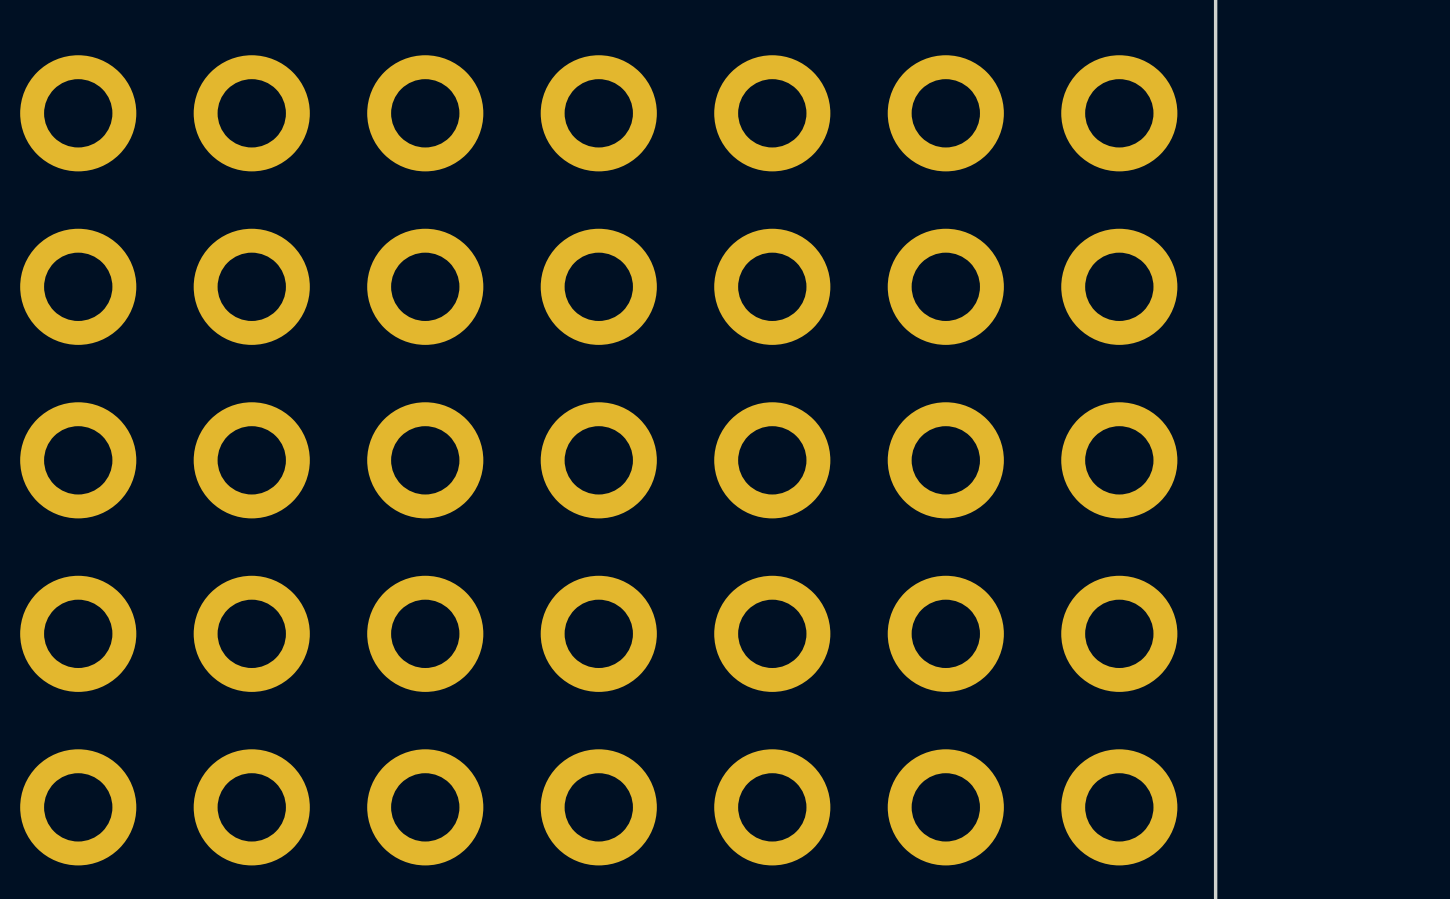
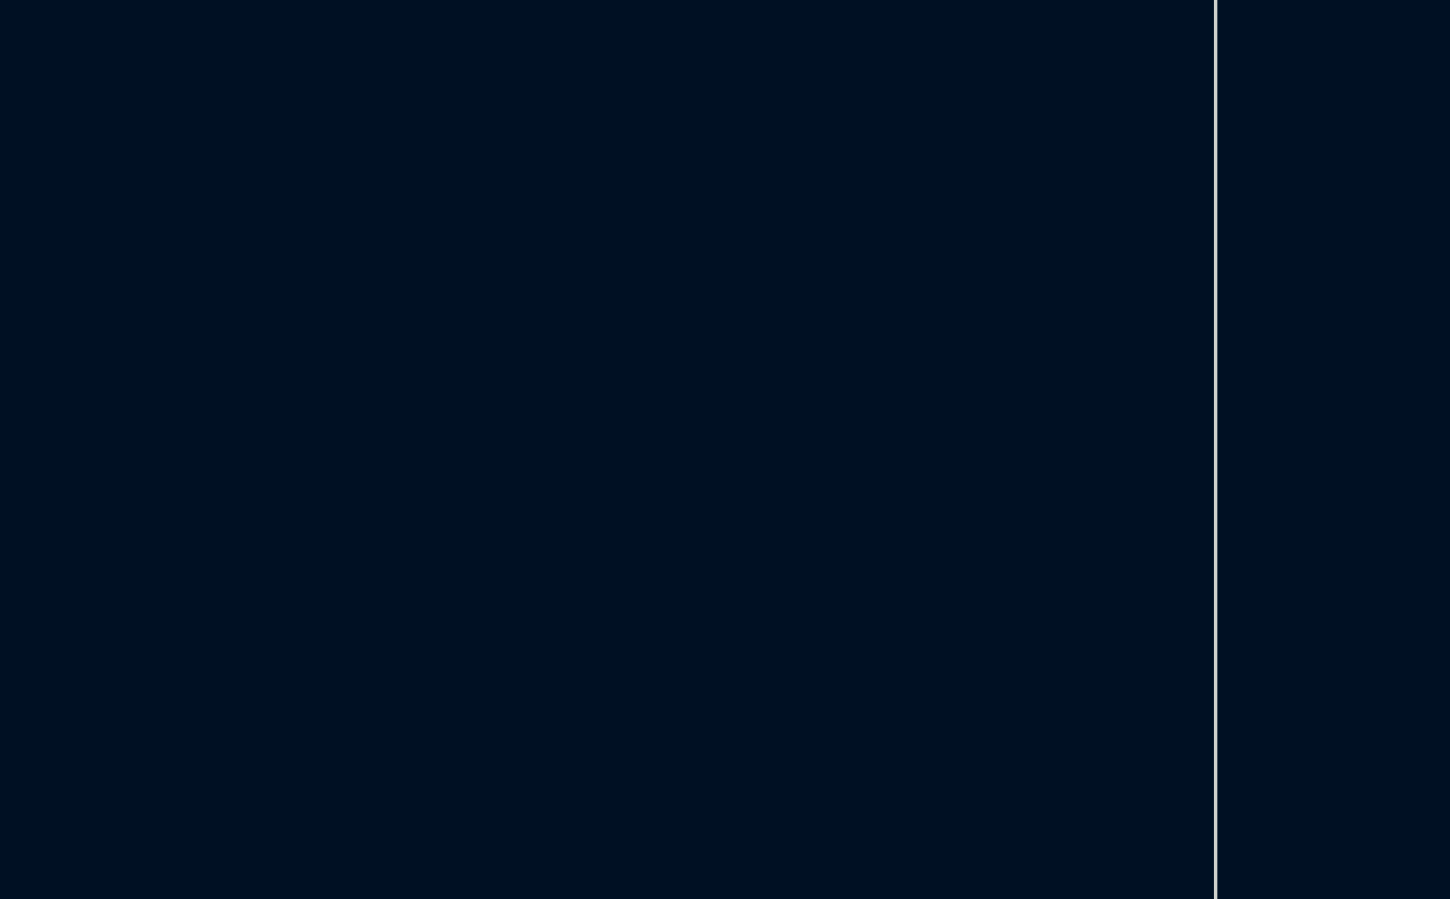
part: (78, 113) -> none
part: (251, 113) -> none
part: (425, 113) -> none
part: (598, 113) -> none
part: (772, 113) -> none
part: (945, 113) -> none
part: (1119, 113) -> none
part: (78, 286) -> none
part: (251, 286) -> none
part: (425, 286) -> none
part: (598, 286) -> none
part: (772, 286) -> none
part: (945, 286) -> none
part: (1119, 286) -> none
part: (78, 460) -> none
part: (251, 460) -> none
part: (425, 460) -> none
part: (598, 460) -> none
part: (772, 460) -> none
part: (945, 460) -> none
part: (1119, 460) -> none
part: (78, 633) -> none
part: (251, 633) -> none
part: (425, 633) -> none
part: (598, 633) -> none
part: (772, 633) -> none
part: (945, 633) -> none
part: (1119, 633) -> none
part: (78, 807) -> none
part: (251, 807) -> none
part: (425, 807) -> none
part: (598, 807) -> none
part: (772, 807) -> none
part: (945, 807) -> none
part: (1119, 807) -> none

